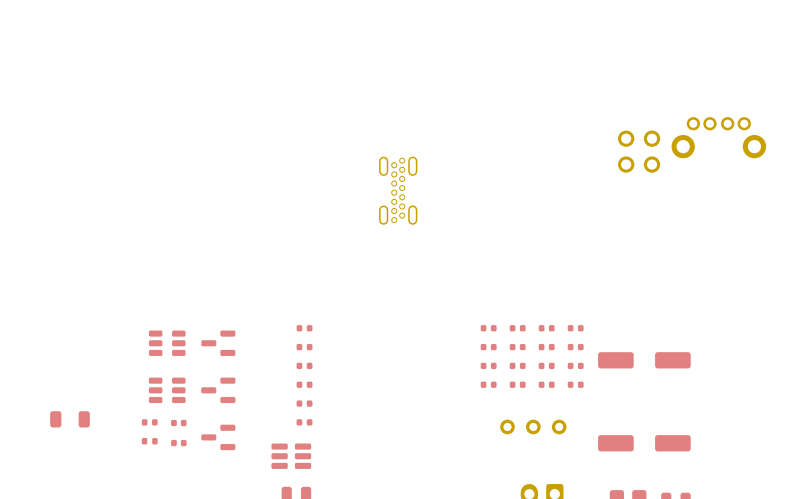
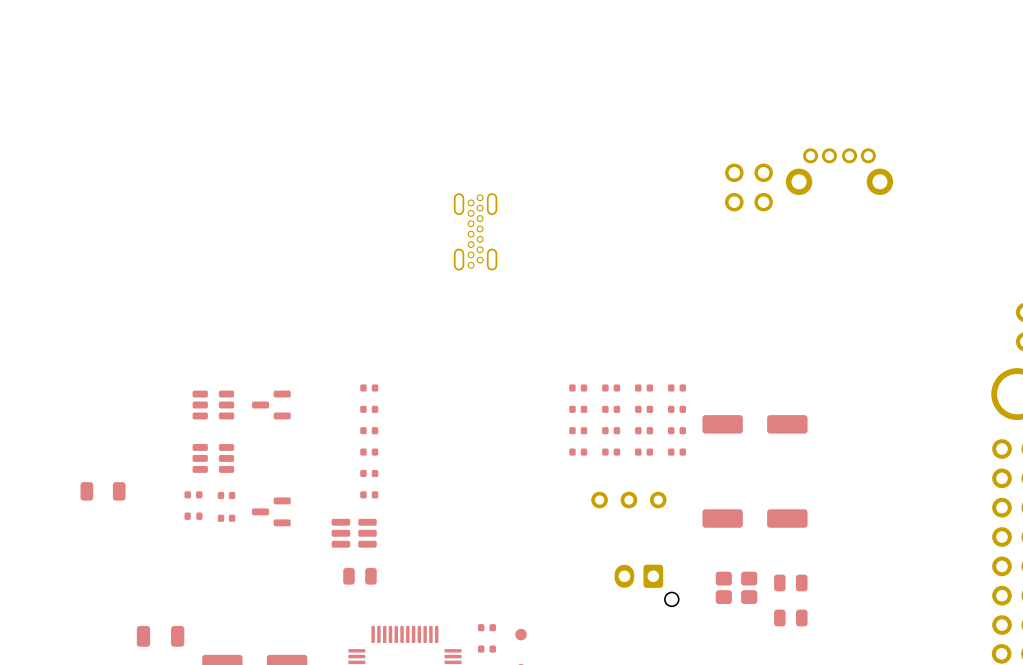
part: (218, 390) -> none

